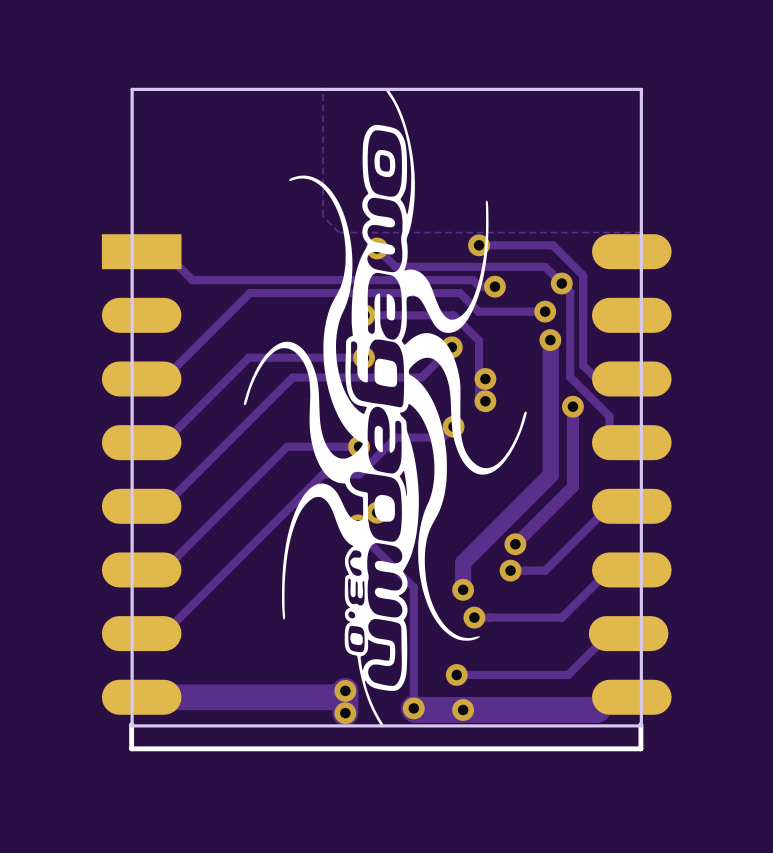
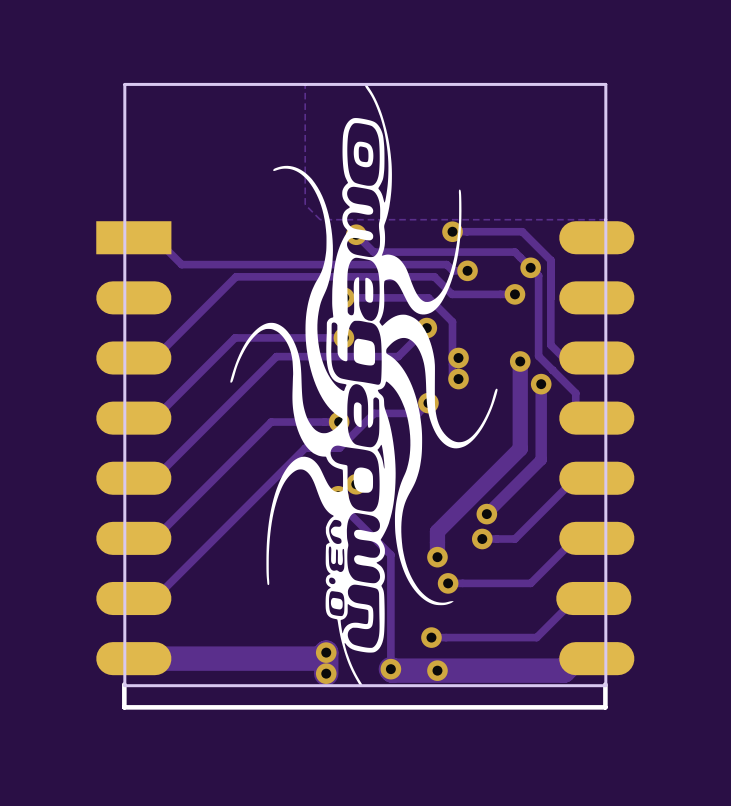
track: (550, 340) (550, 382) -> none
via position: (550, 340) -> (520, 361)

